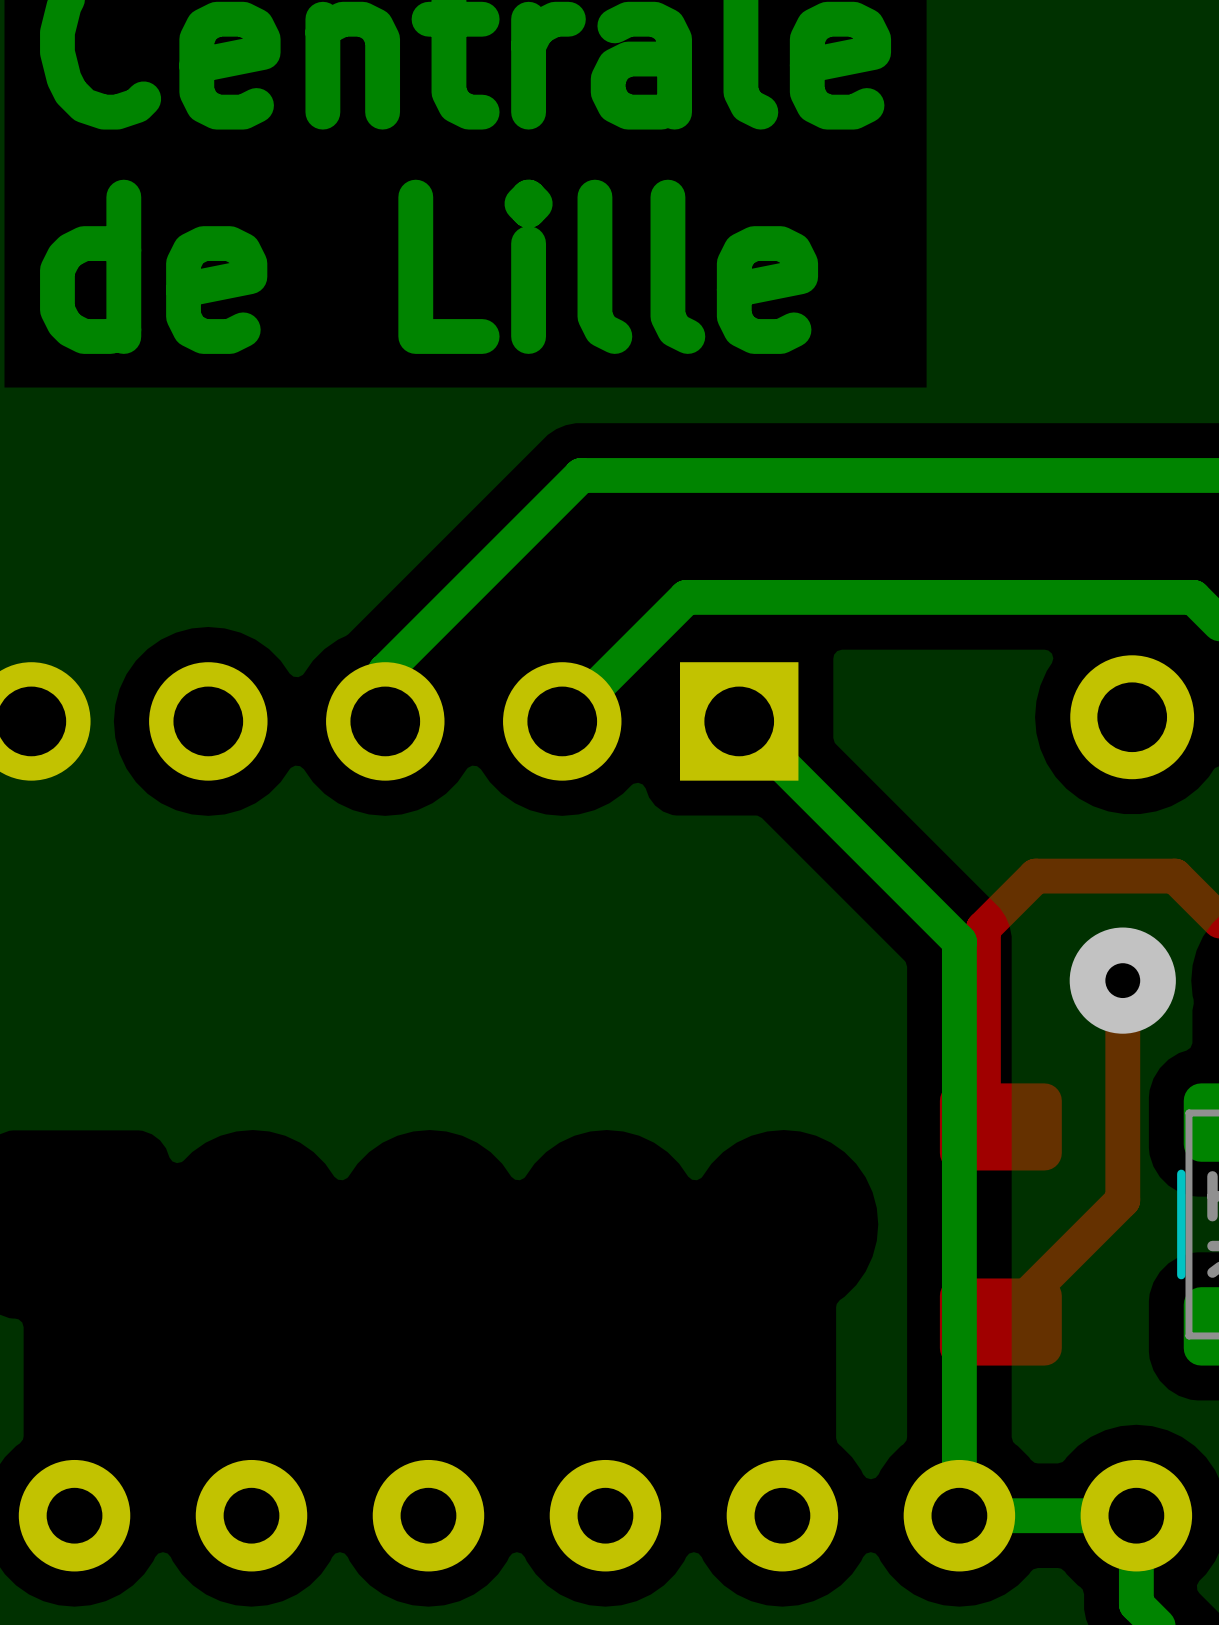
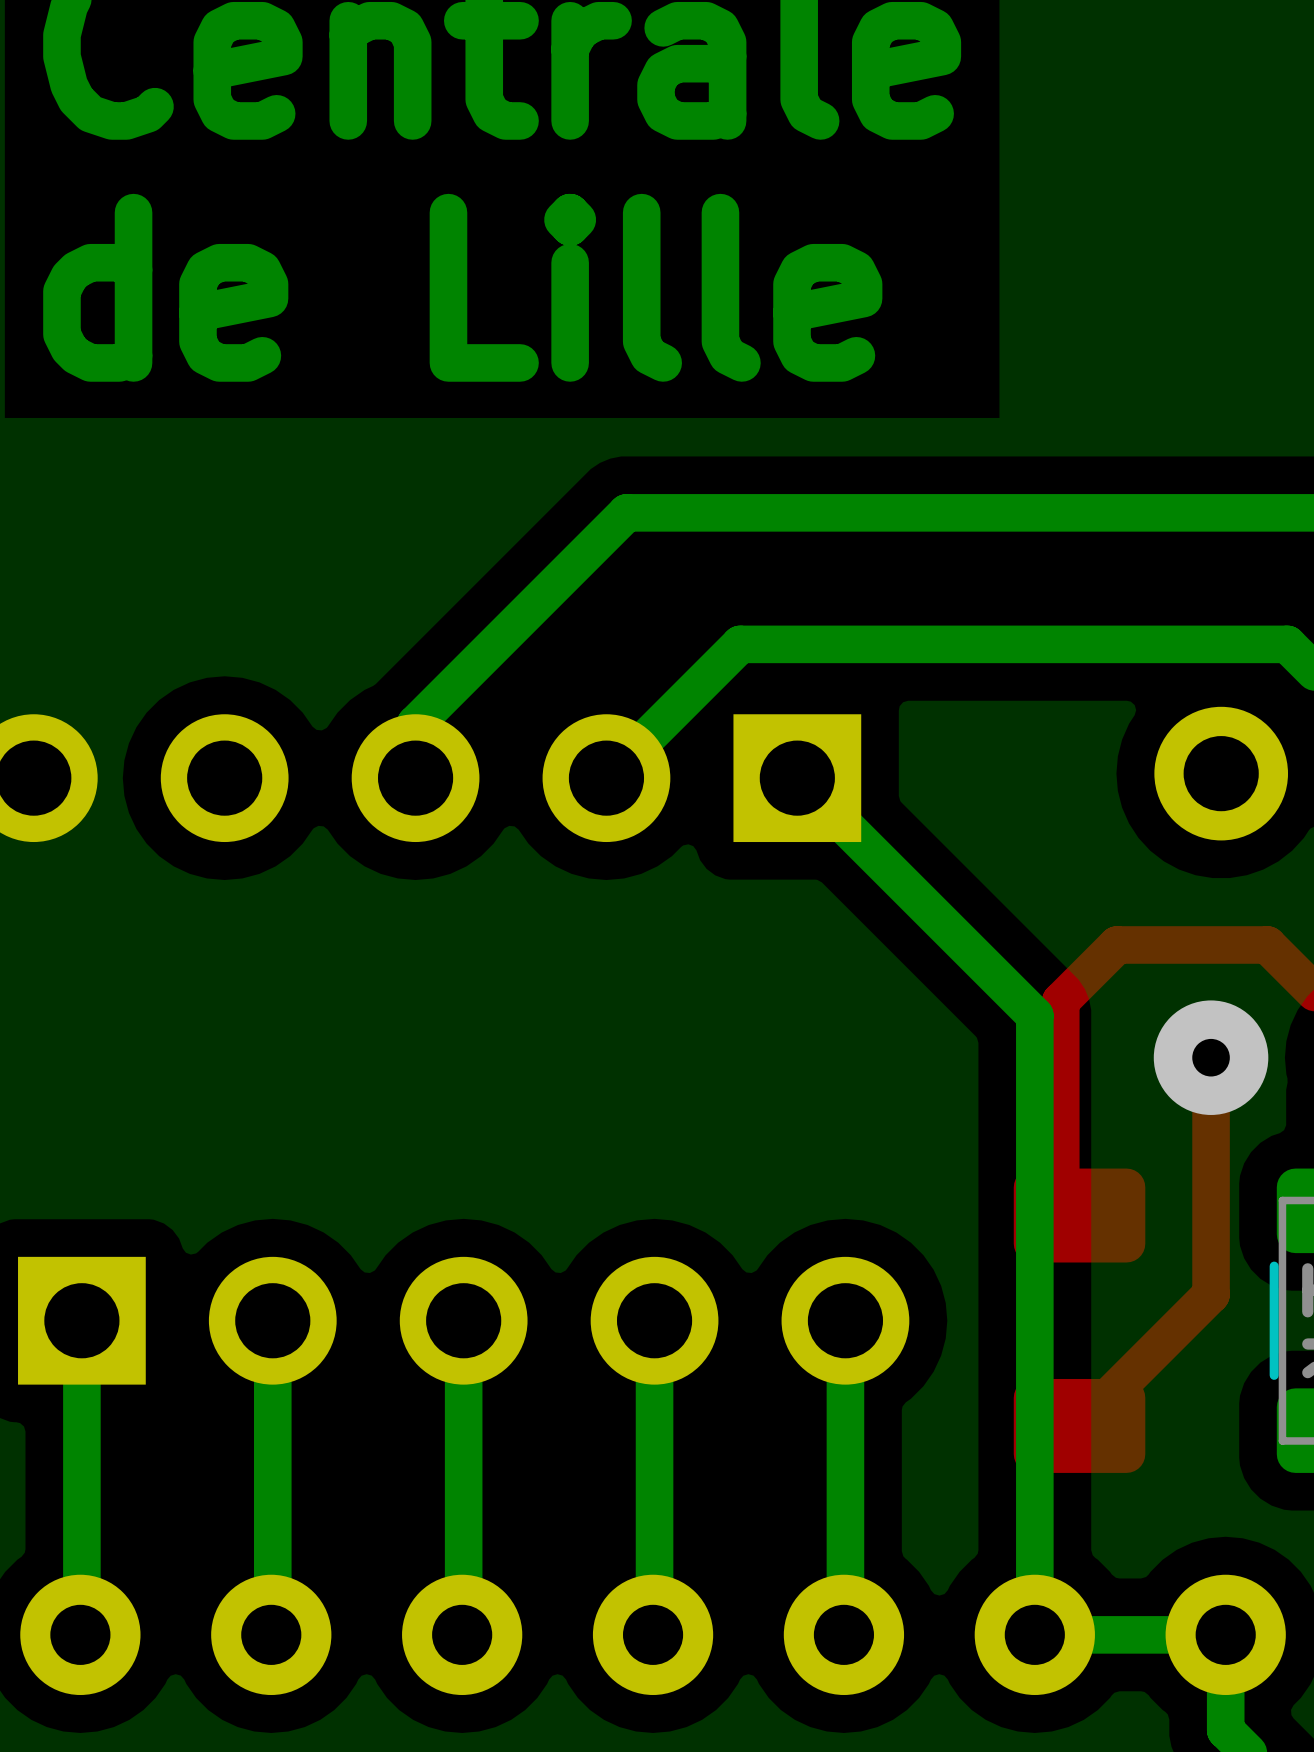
bottom track: none -> (81, 1320) (81, 1633)
bottom track: none -> (272, 1320) (272, 1633)
bottom track: none -> (463, 1320) (463, 1633)
part: none -> (463, 1320)
bottom track: none -> (654, 1320) (654, 1633)
bottom track: none -> (845, 1320) (845, 1633)

